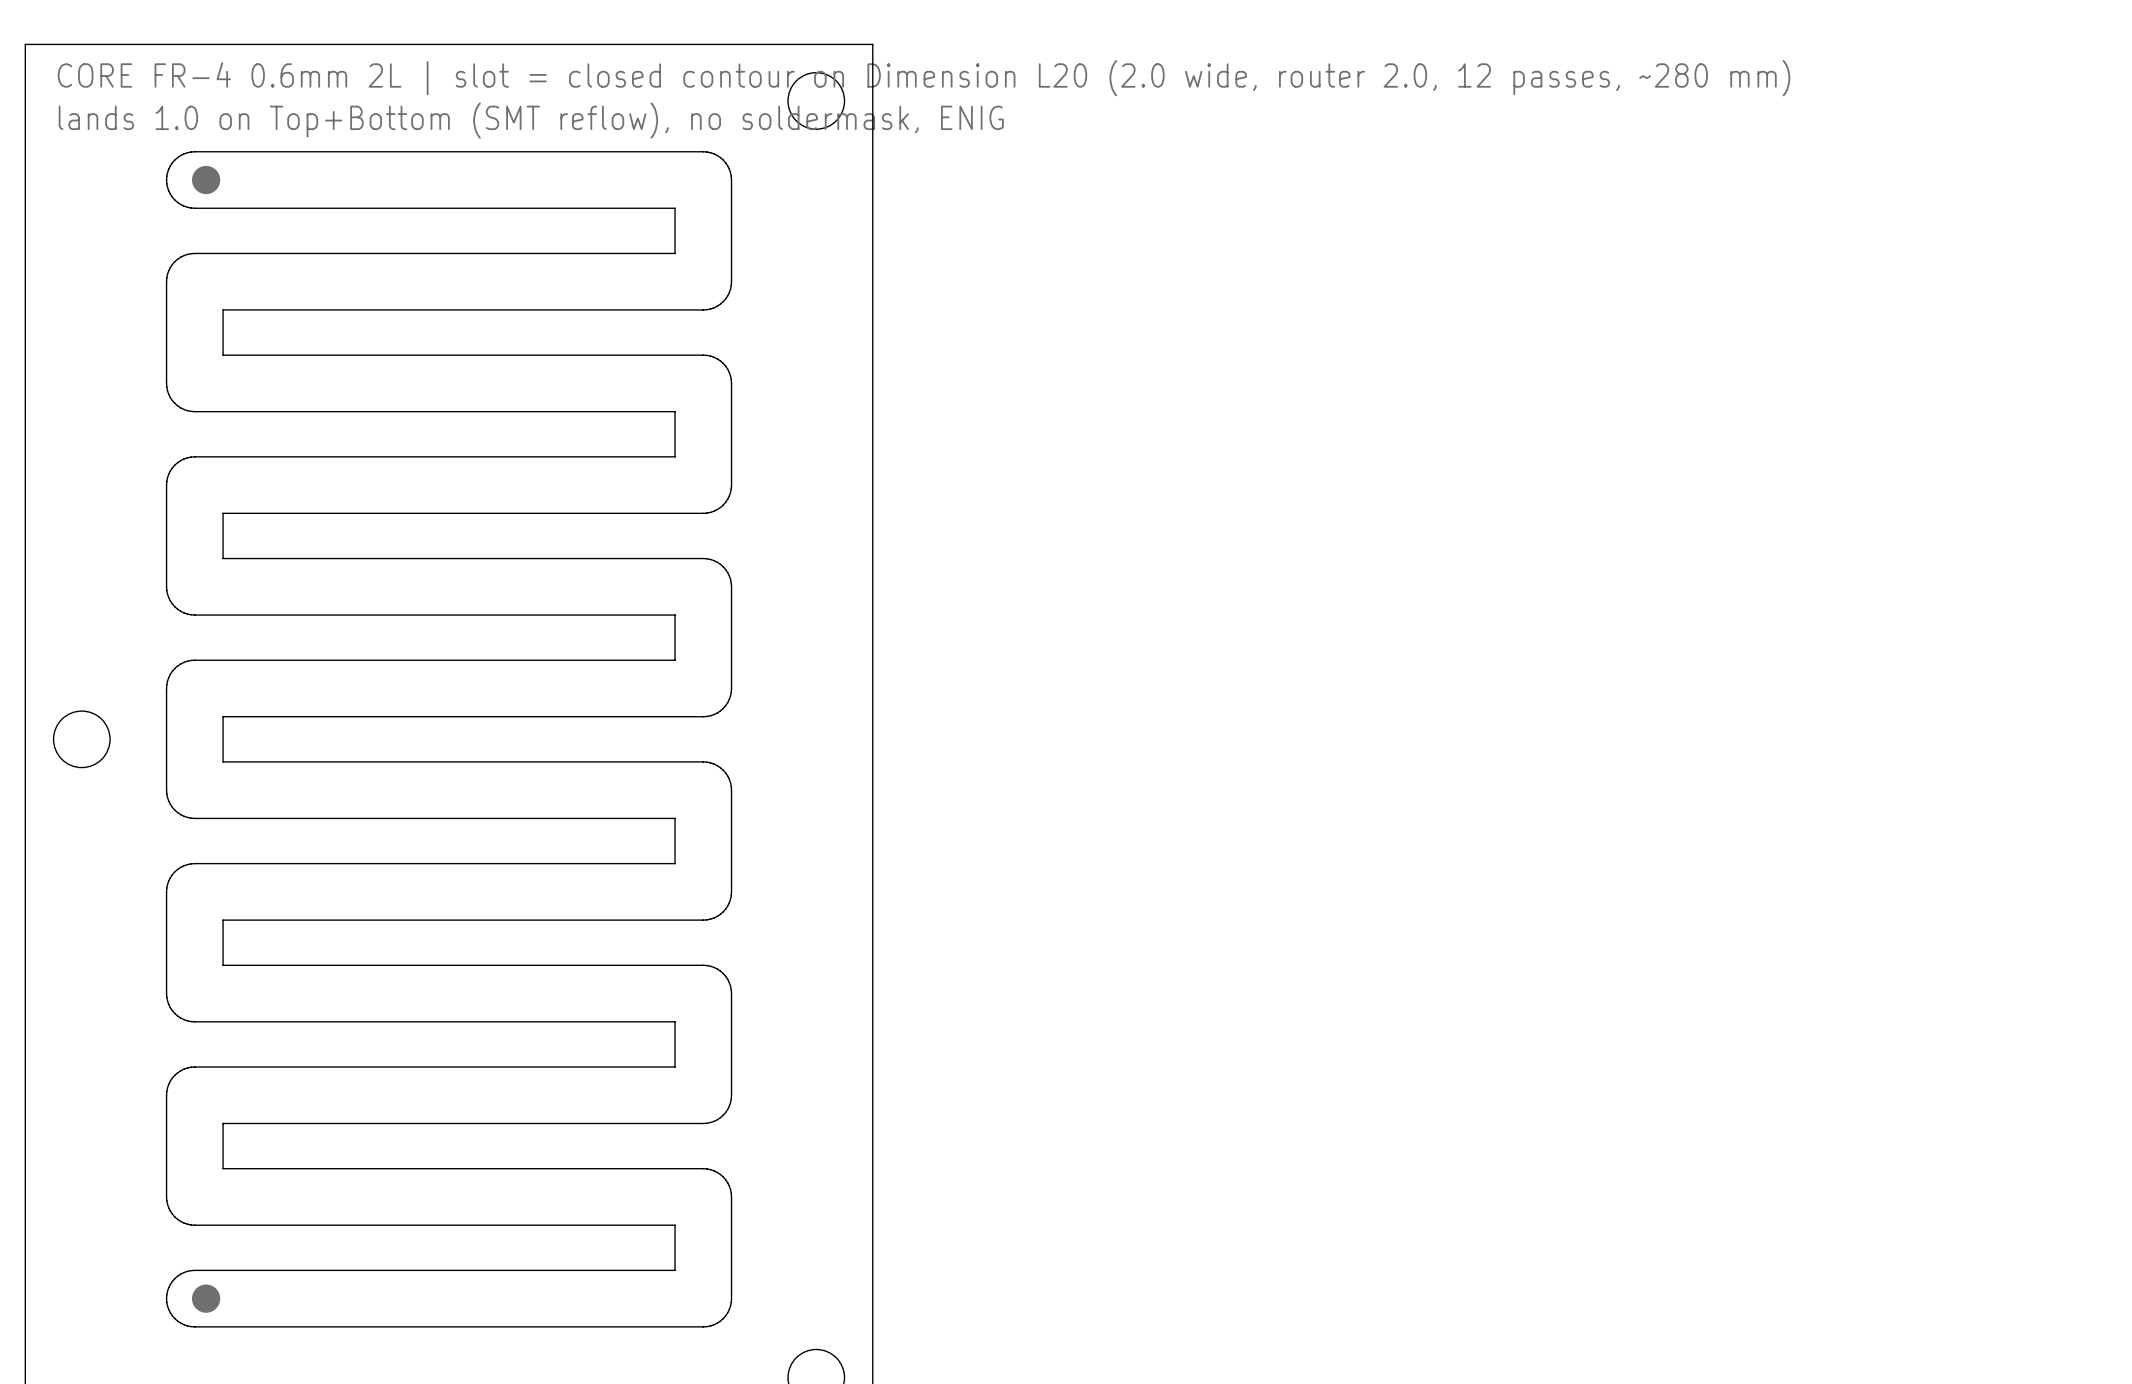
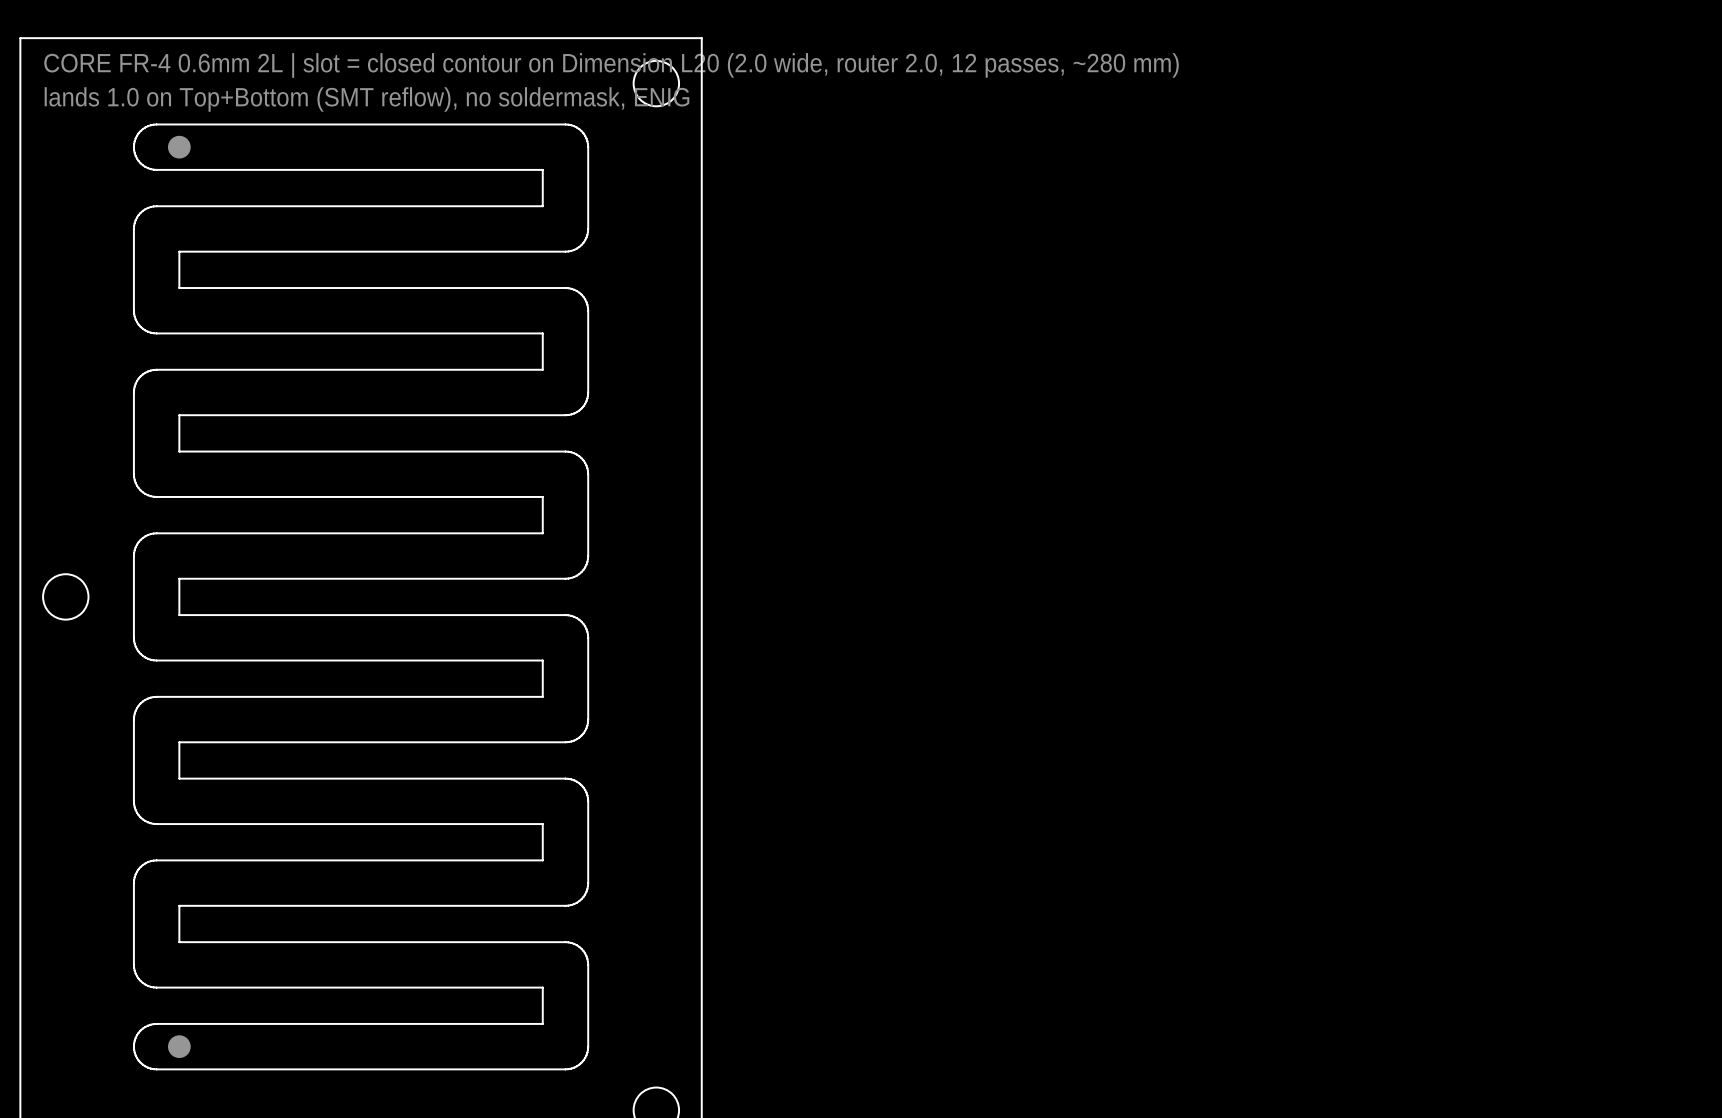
drawing position: (206, 180) -> (179, 147)
drawing position: (206, 1298) -> (179, 1046)

